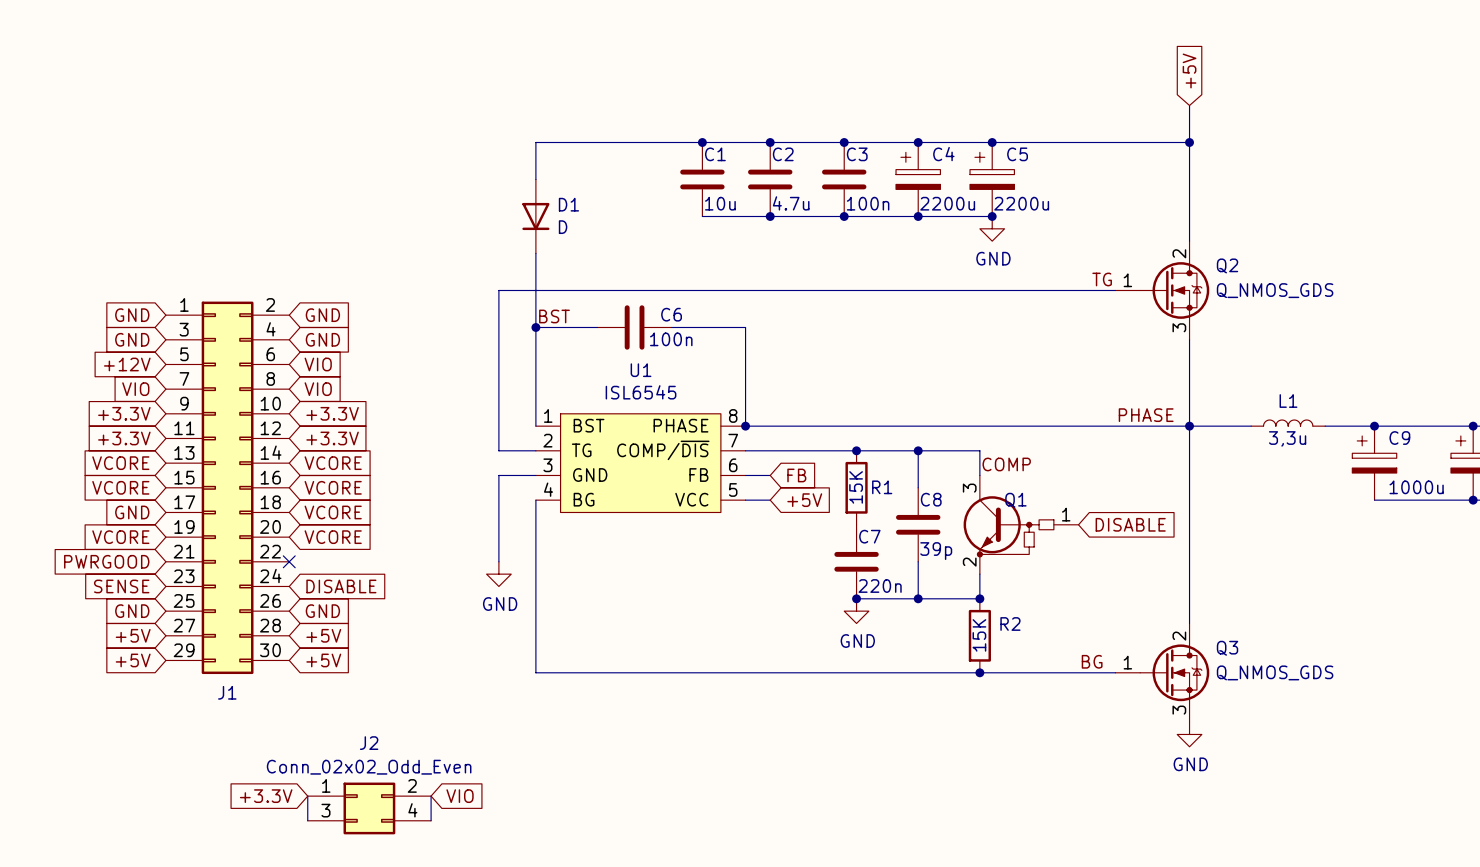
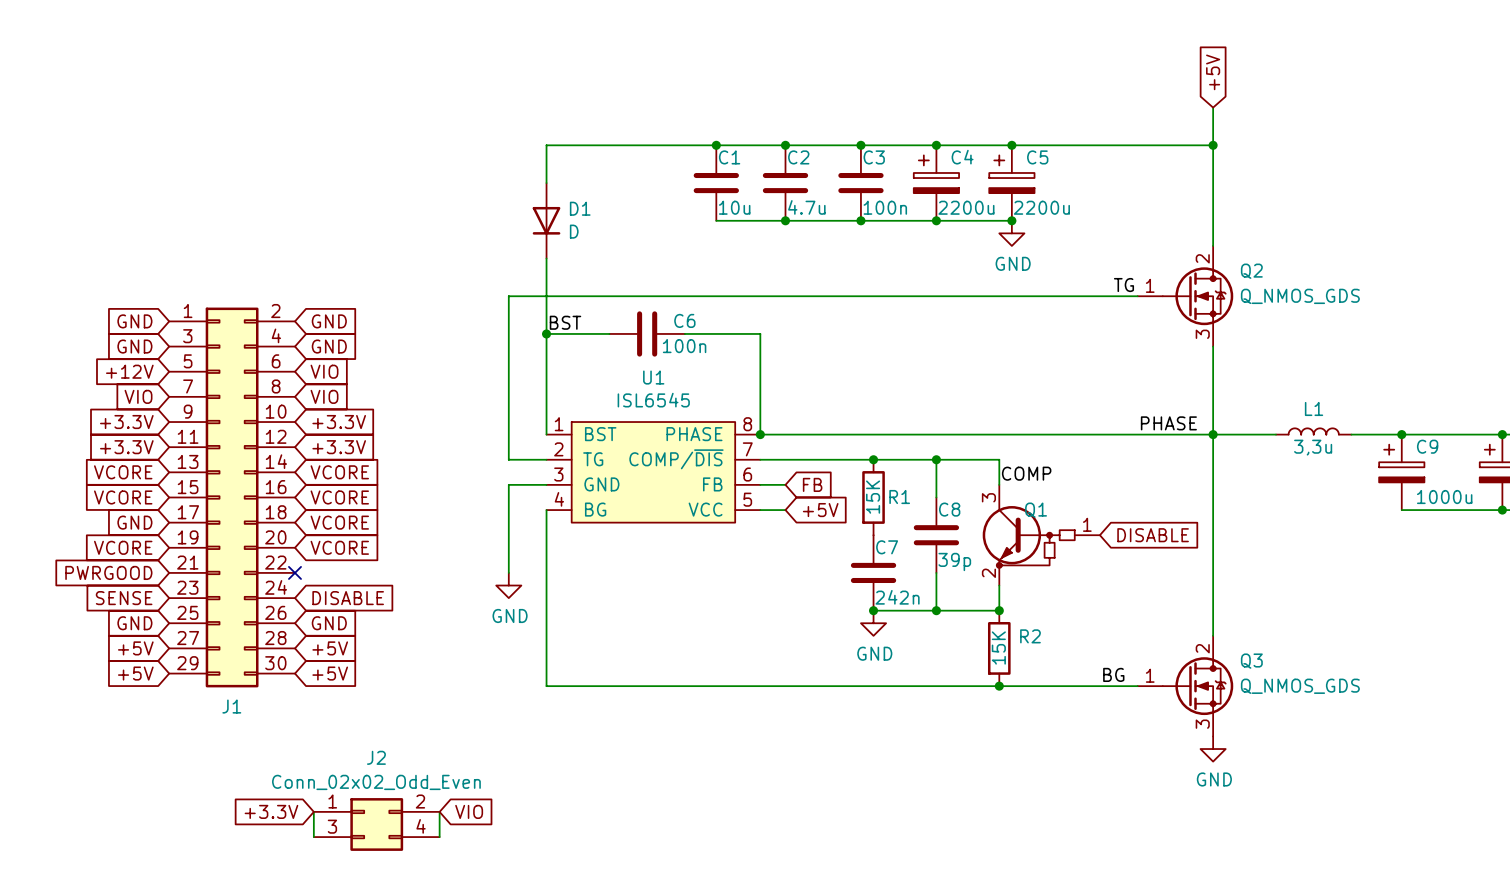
C7 value: 220n (880, 586) -> 242n (897, 597)

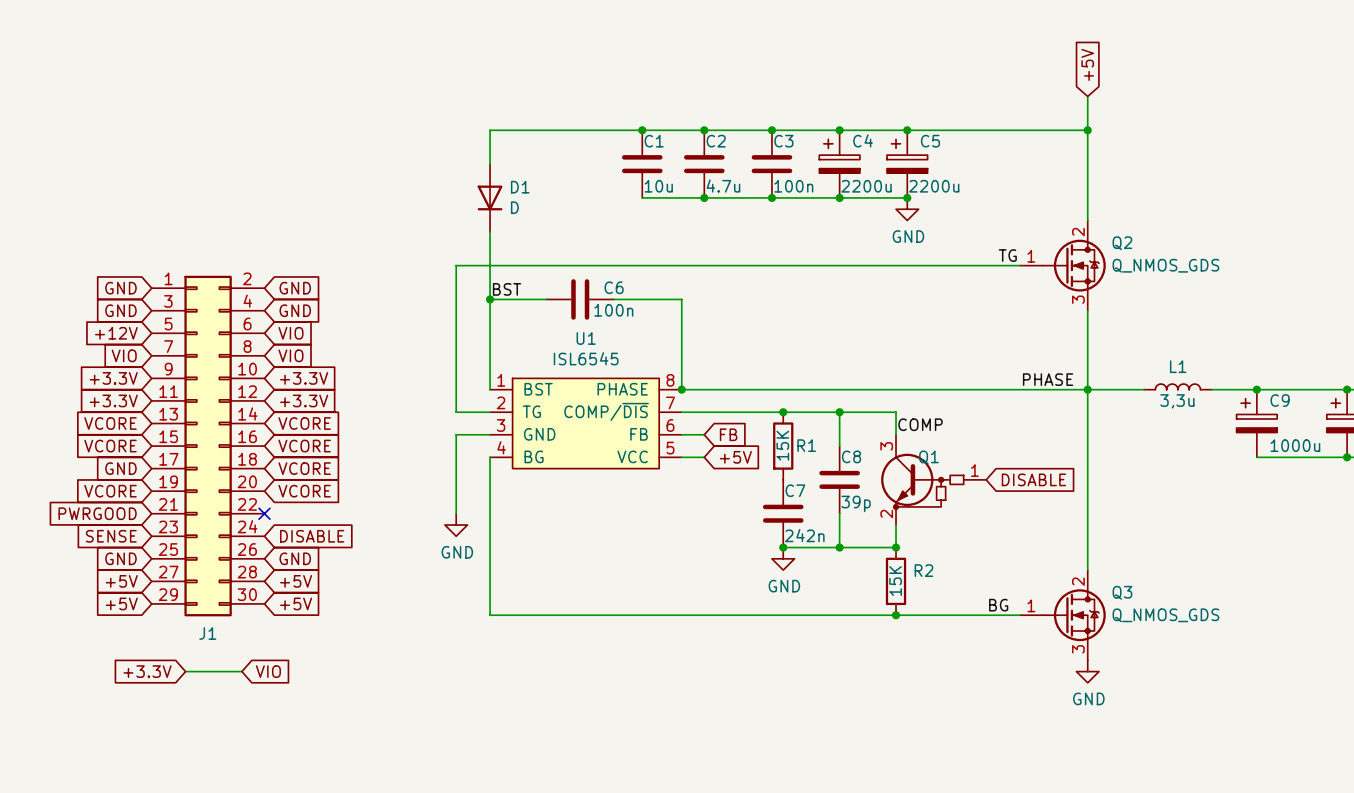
wire: none -> (185, 671) (241, 671)
global label position: +3.3V (271, 811) -> +3.3V (147, 671)
wire: (313, 811) (313, 837) -> none
wire: (439, 811) (439, 837) -> none
global label position: VIO (469, 811) -> VIO (268, 671)
J2: Conn_02x02_Odd_Even (376, 824) -> none

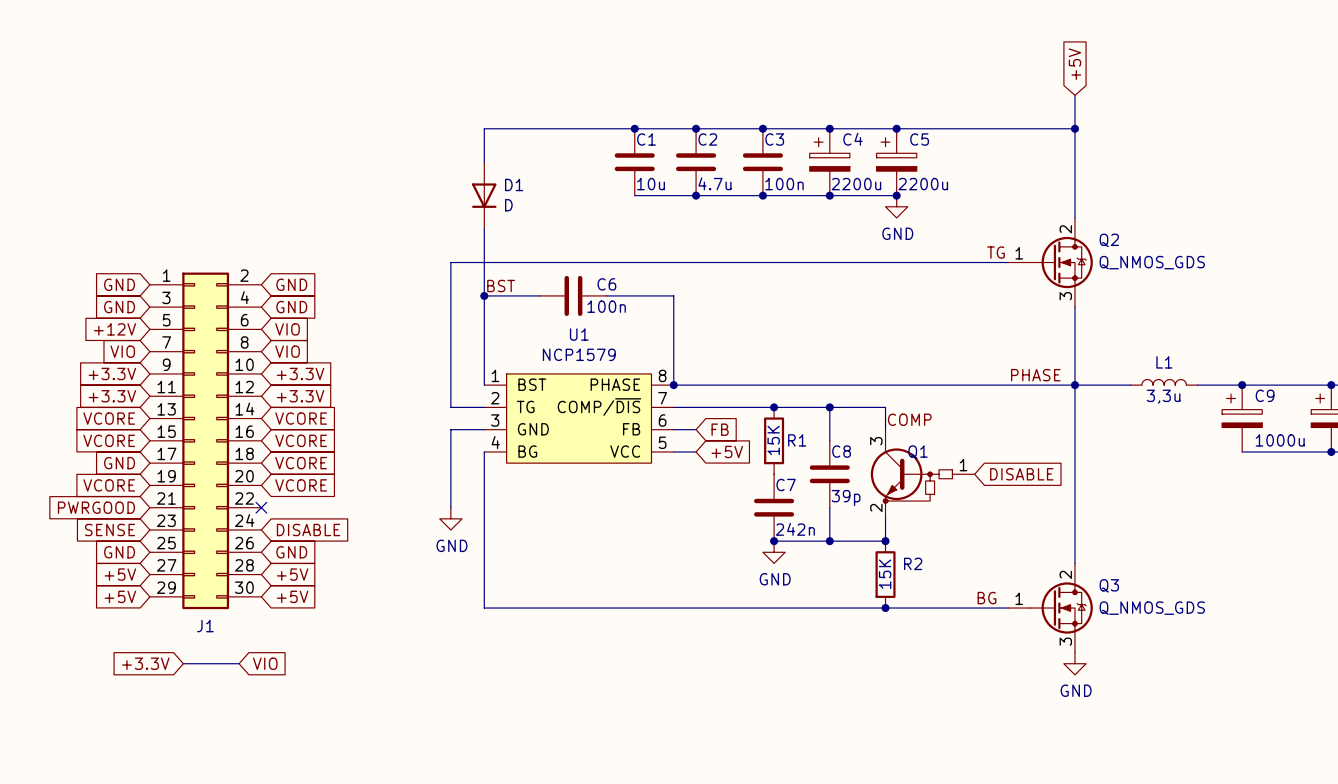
U1 value: ISL6545 (586, 358) -> NCP1579 (579, 354)

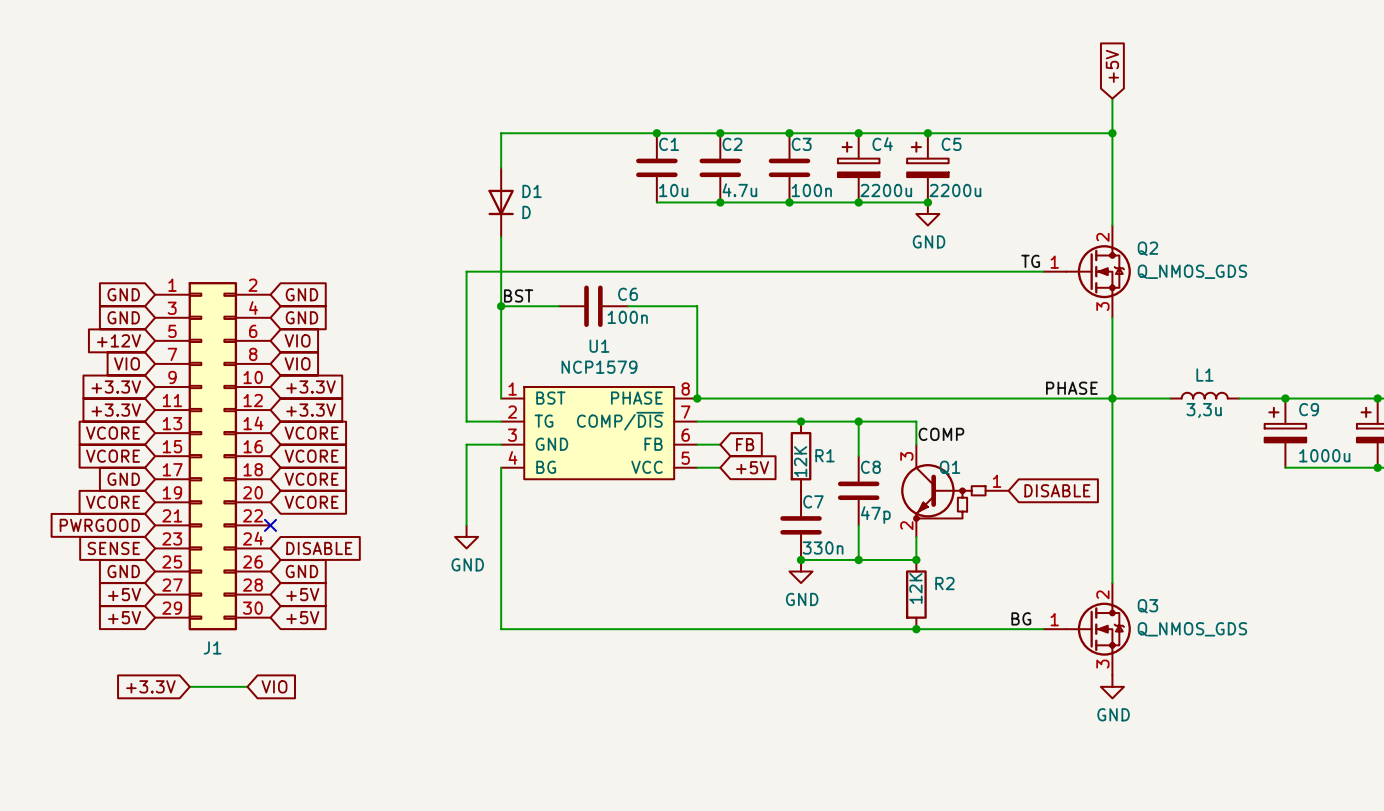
R1 value: 15K (773, 440) -> 12K (800, 461)
C8 value: 39p (846, 498) -> 47p (875, 515)
C7 value: 242n (795, 529) -> 330n (823, 548)
R2 value: 15K (885, 574) -> 12K (915, 588)

